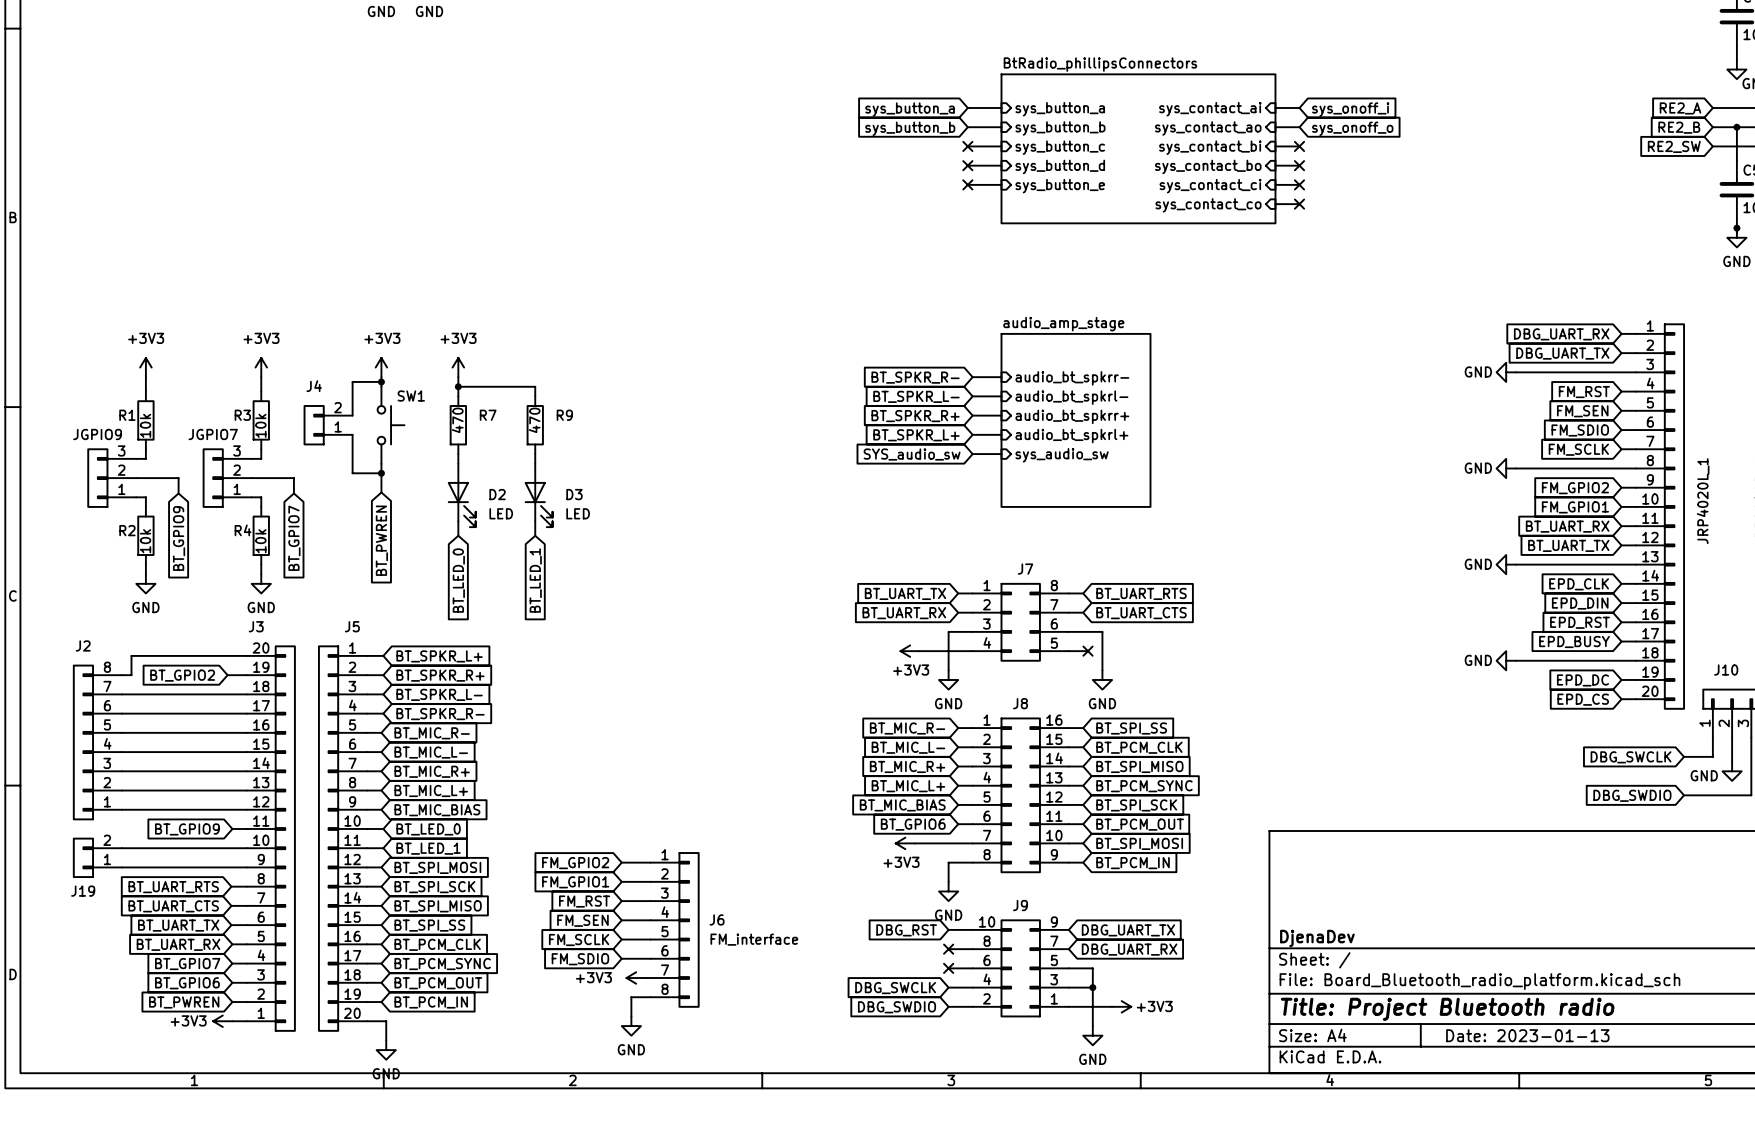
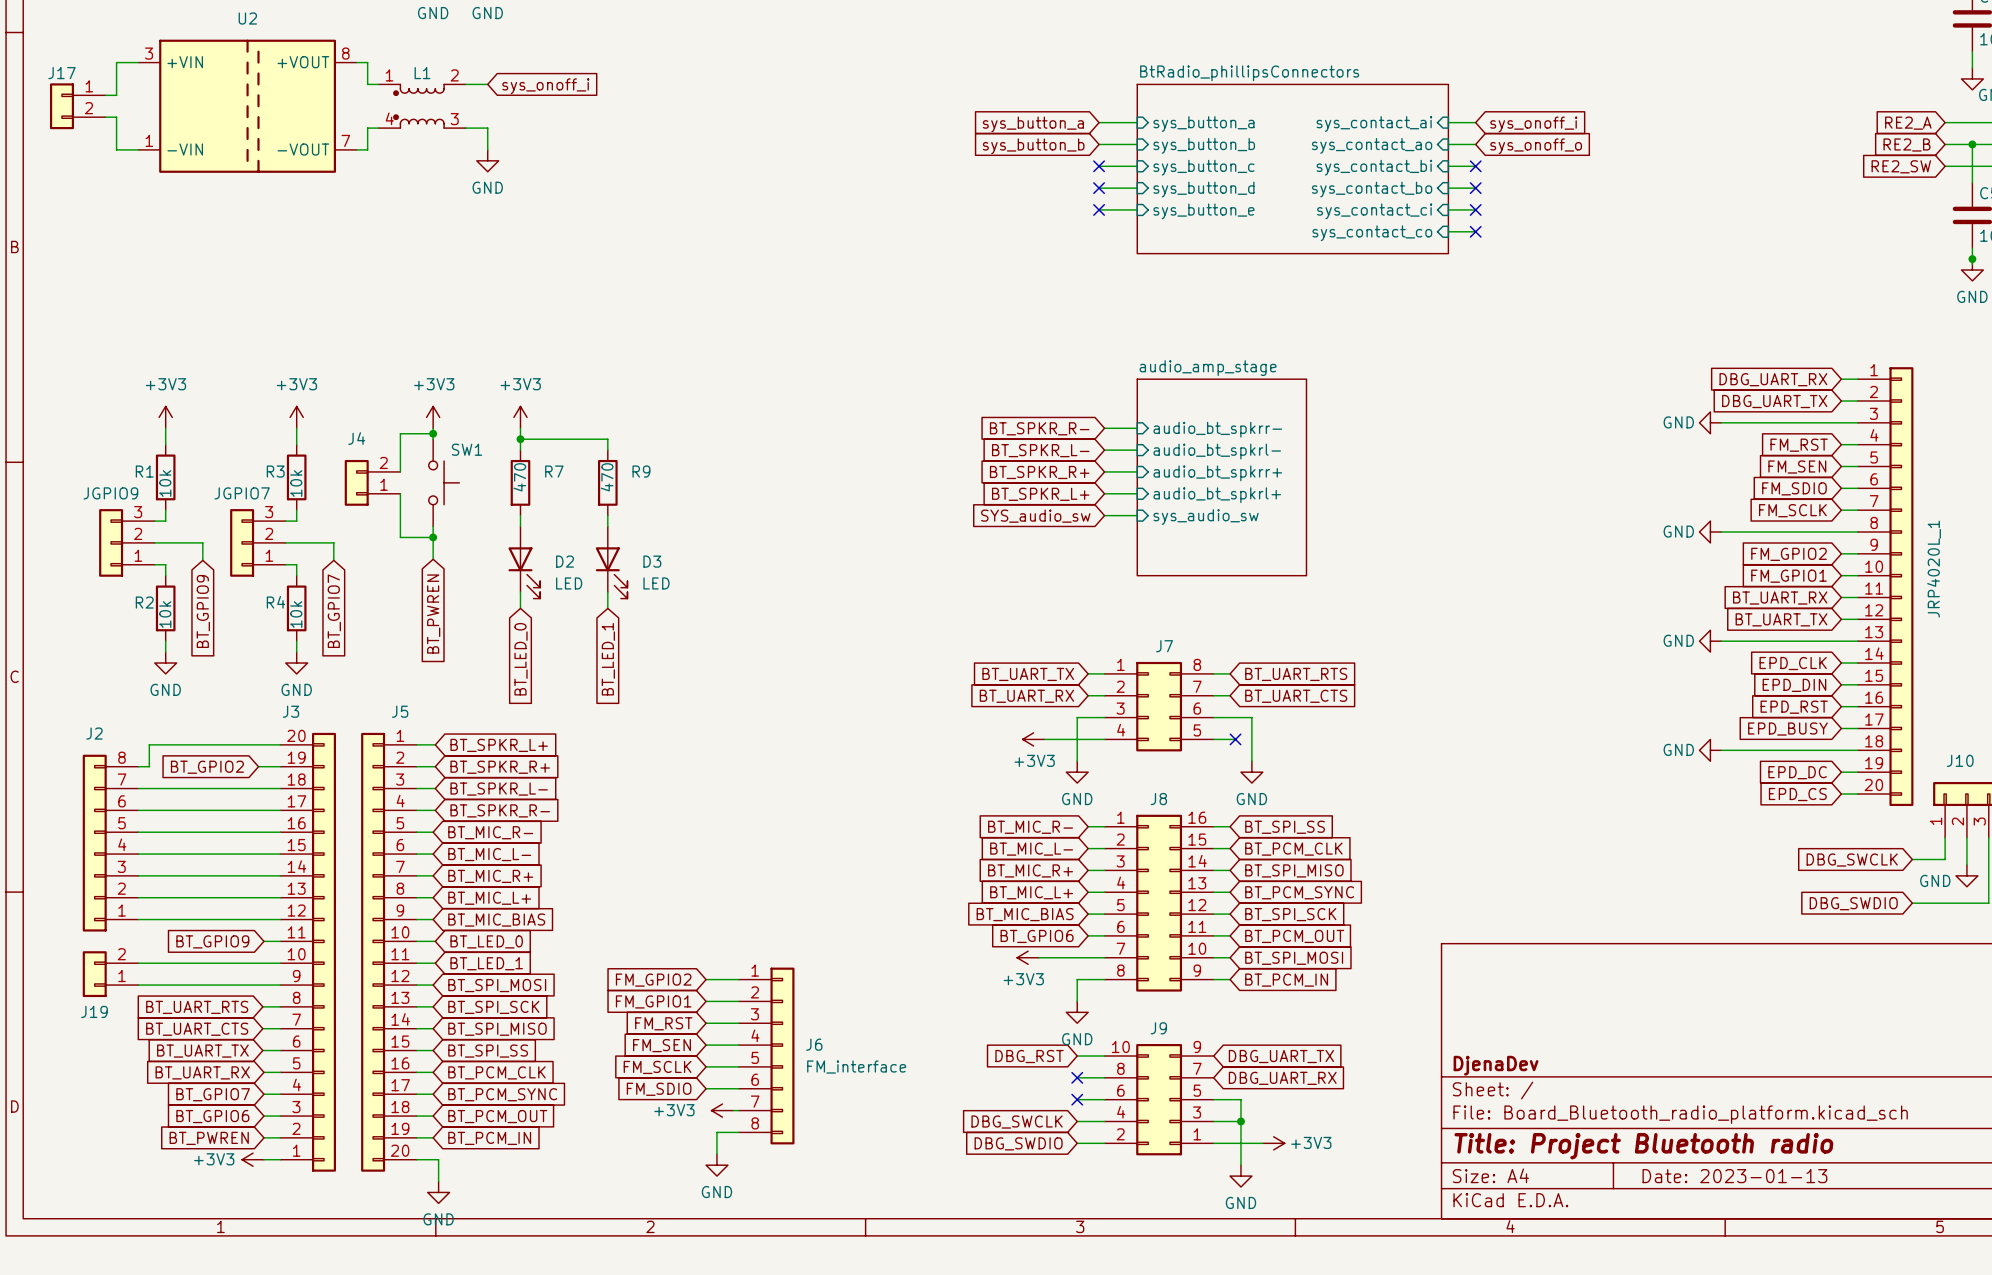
wire: none -> (138, 62) (116, 62) (116, 95) (105, 95)
wire: none -> (356, 62) (367, 62) (367, 84) (378, 84)
wire: none -> (465, 84) (487, 84)
global label: none -> sys_onoff_i (545, 86)
J17: none -> (77, 106)
U2: none -> (247, 106)
L1: none -> (422, 106)
wire: none -> (105, 117) (116, 117) (116, 149) (138, 149)
wire: none -> (378, 128) (367, 128) (367, 149) (356, 149)
wire: none -> (465, 128) (487, 128) (487, 149)
power symbol: none -> GND (487, 160)

